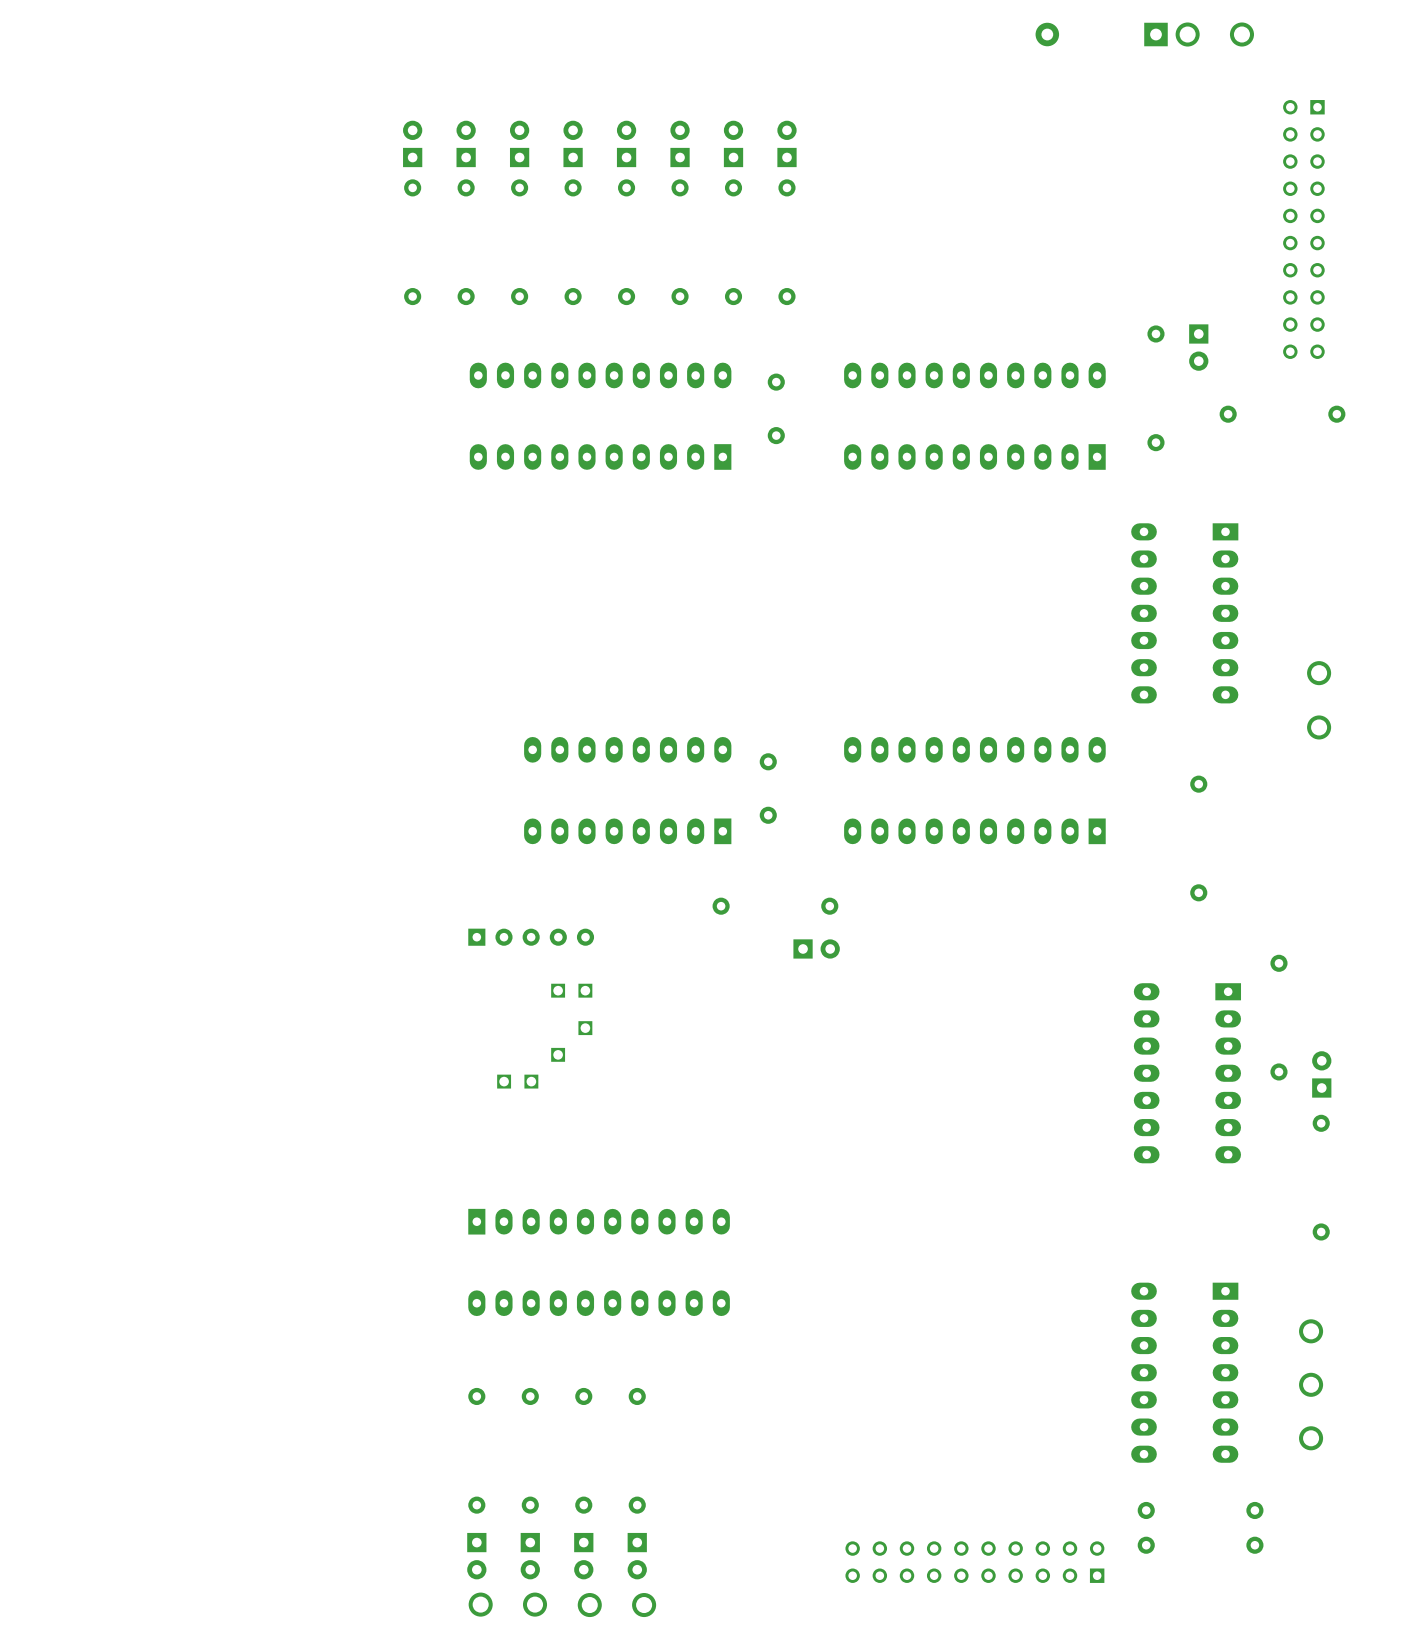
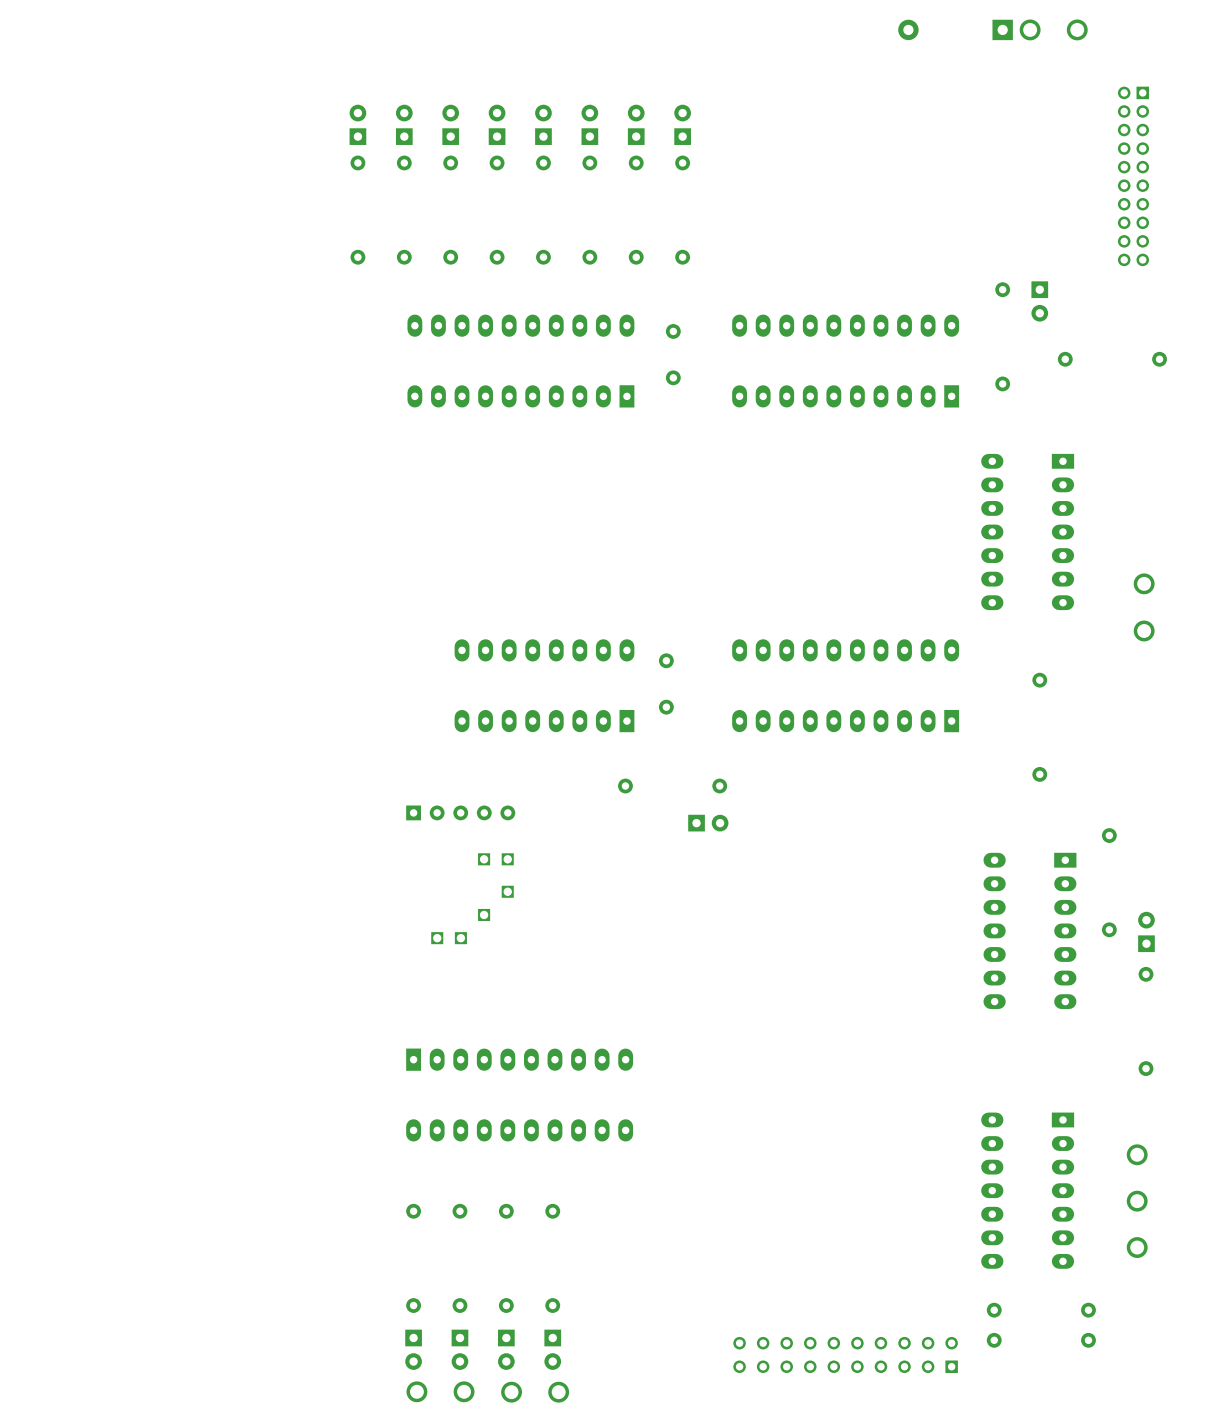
part: none -> (1133, 176)
part: (1303, 229) -> none

